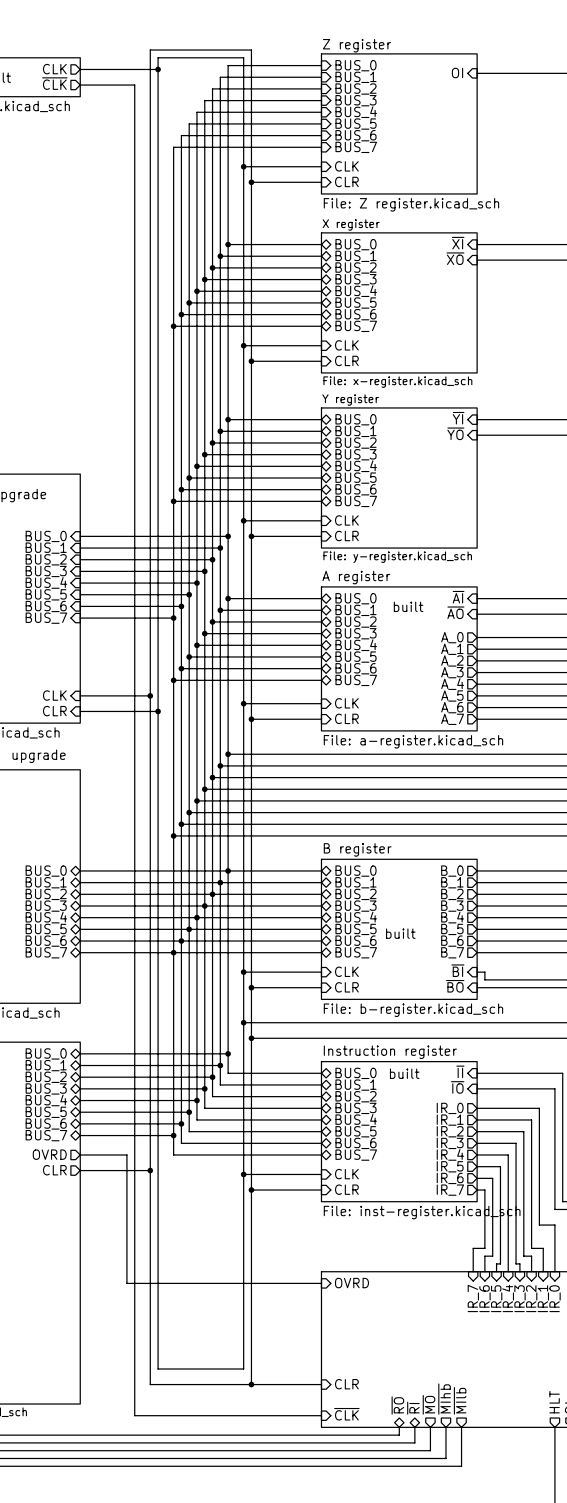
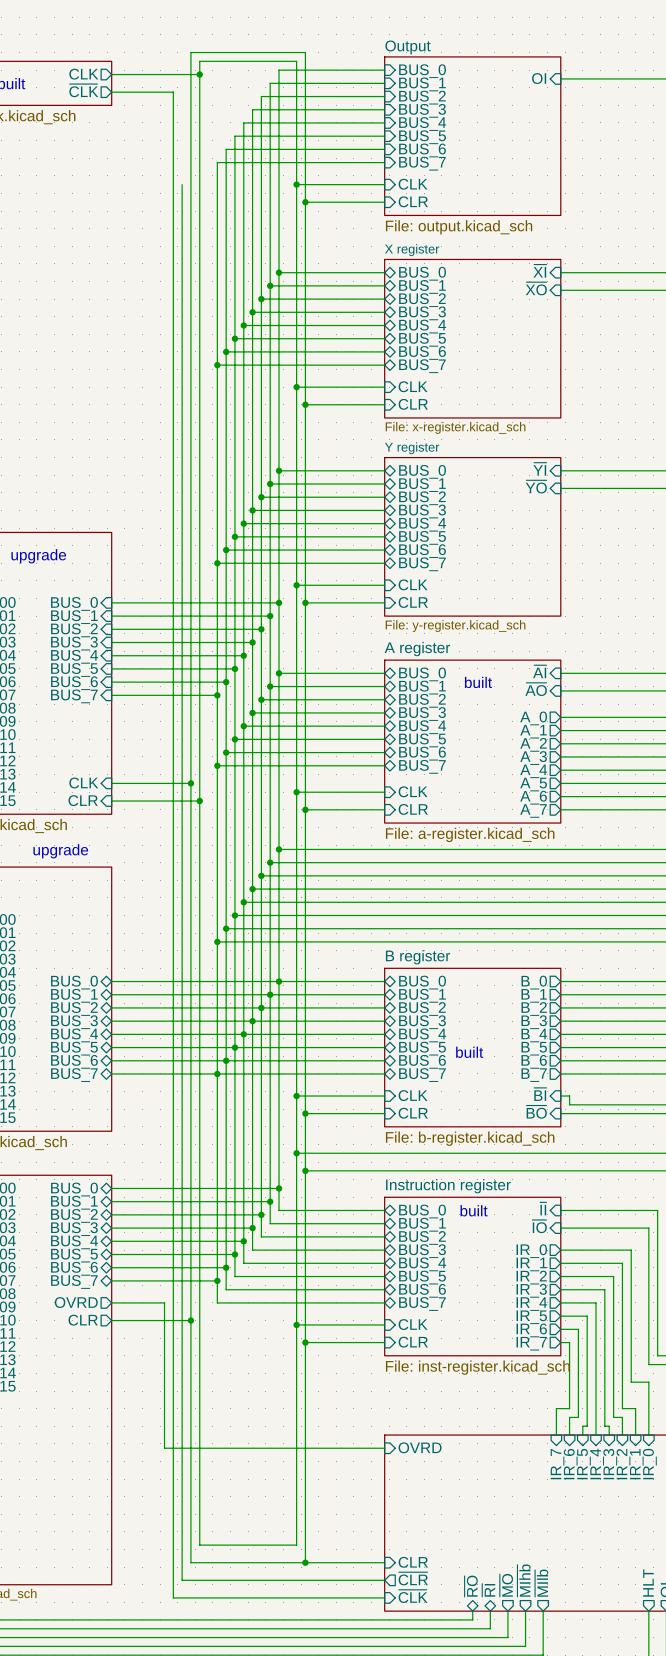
sheet Z register name: Z register (357, 45) -> Output (408, 47)
wire: none -> (182, 184) (182, 1580) (384, 1580)
sheet Z register value: File: Z register.kicad_sch (411, 204) -> File: output.kicad_sch (459, 227)
sheet pin: none -> ~{CLR} (413, 1578)

